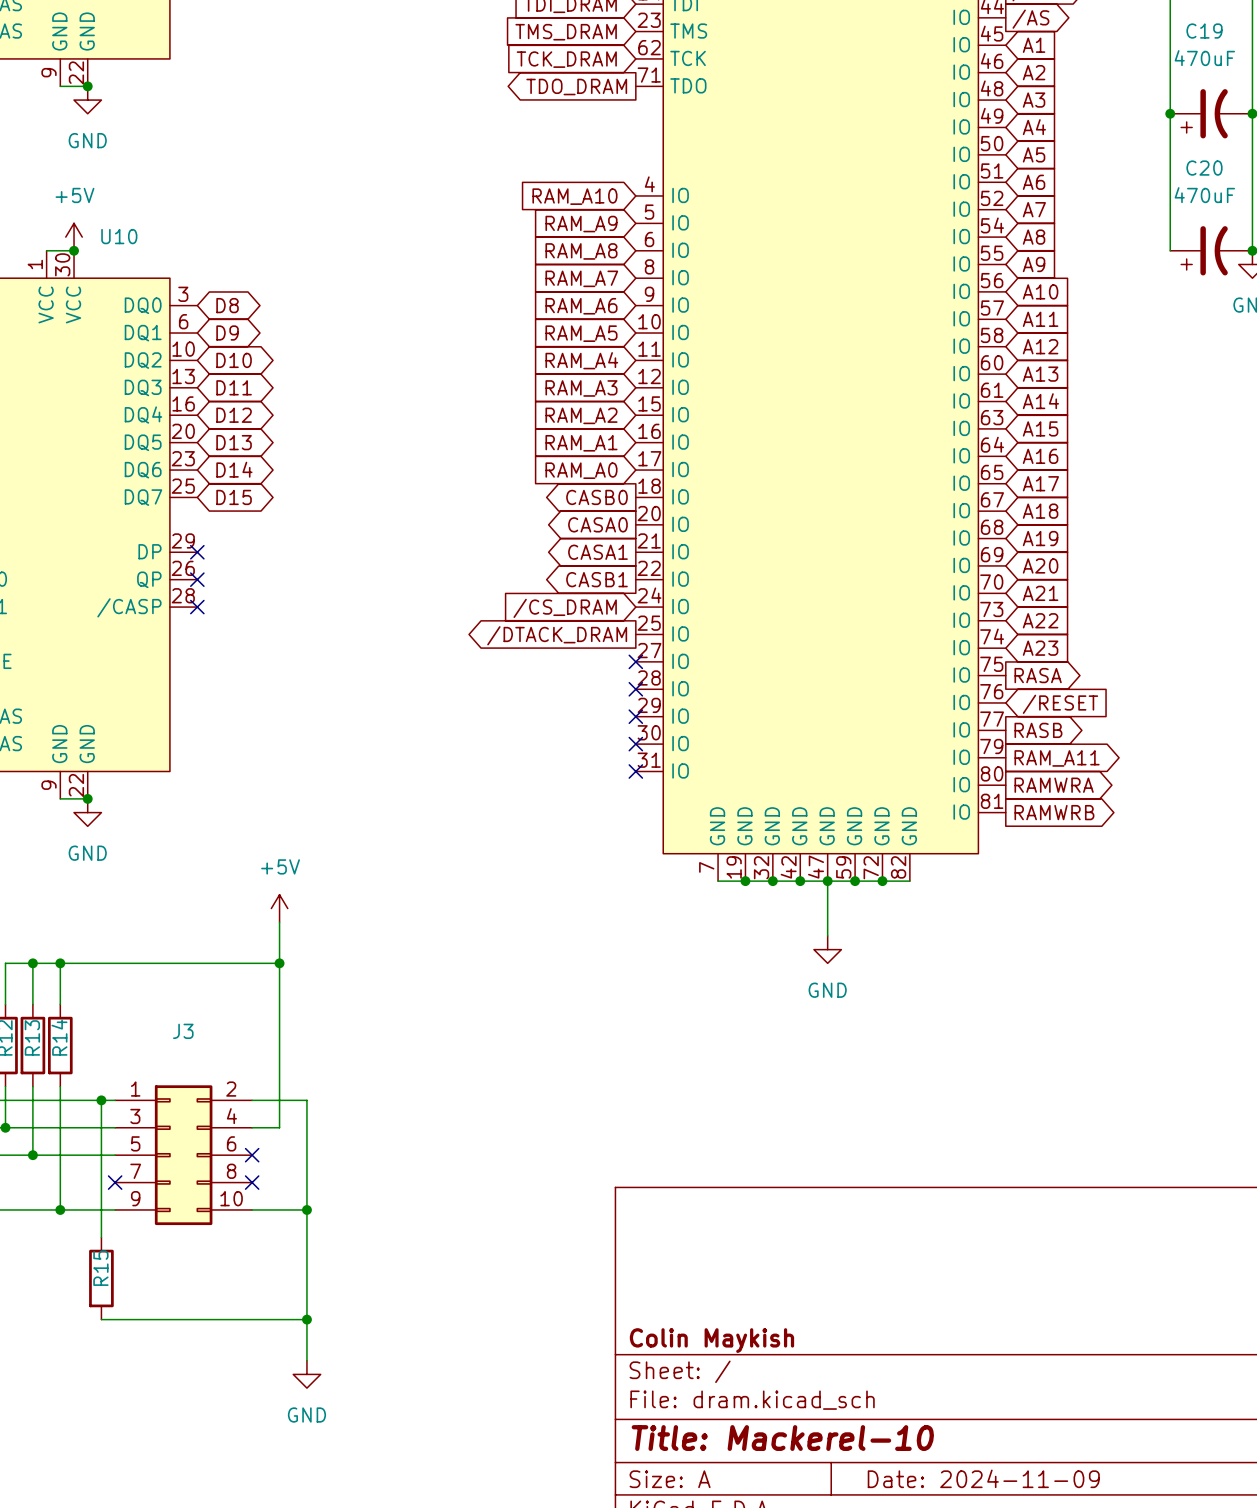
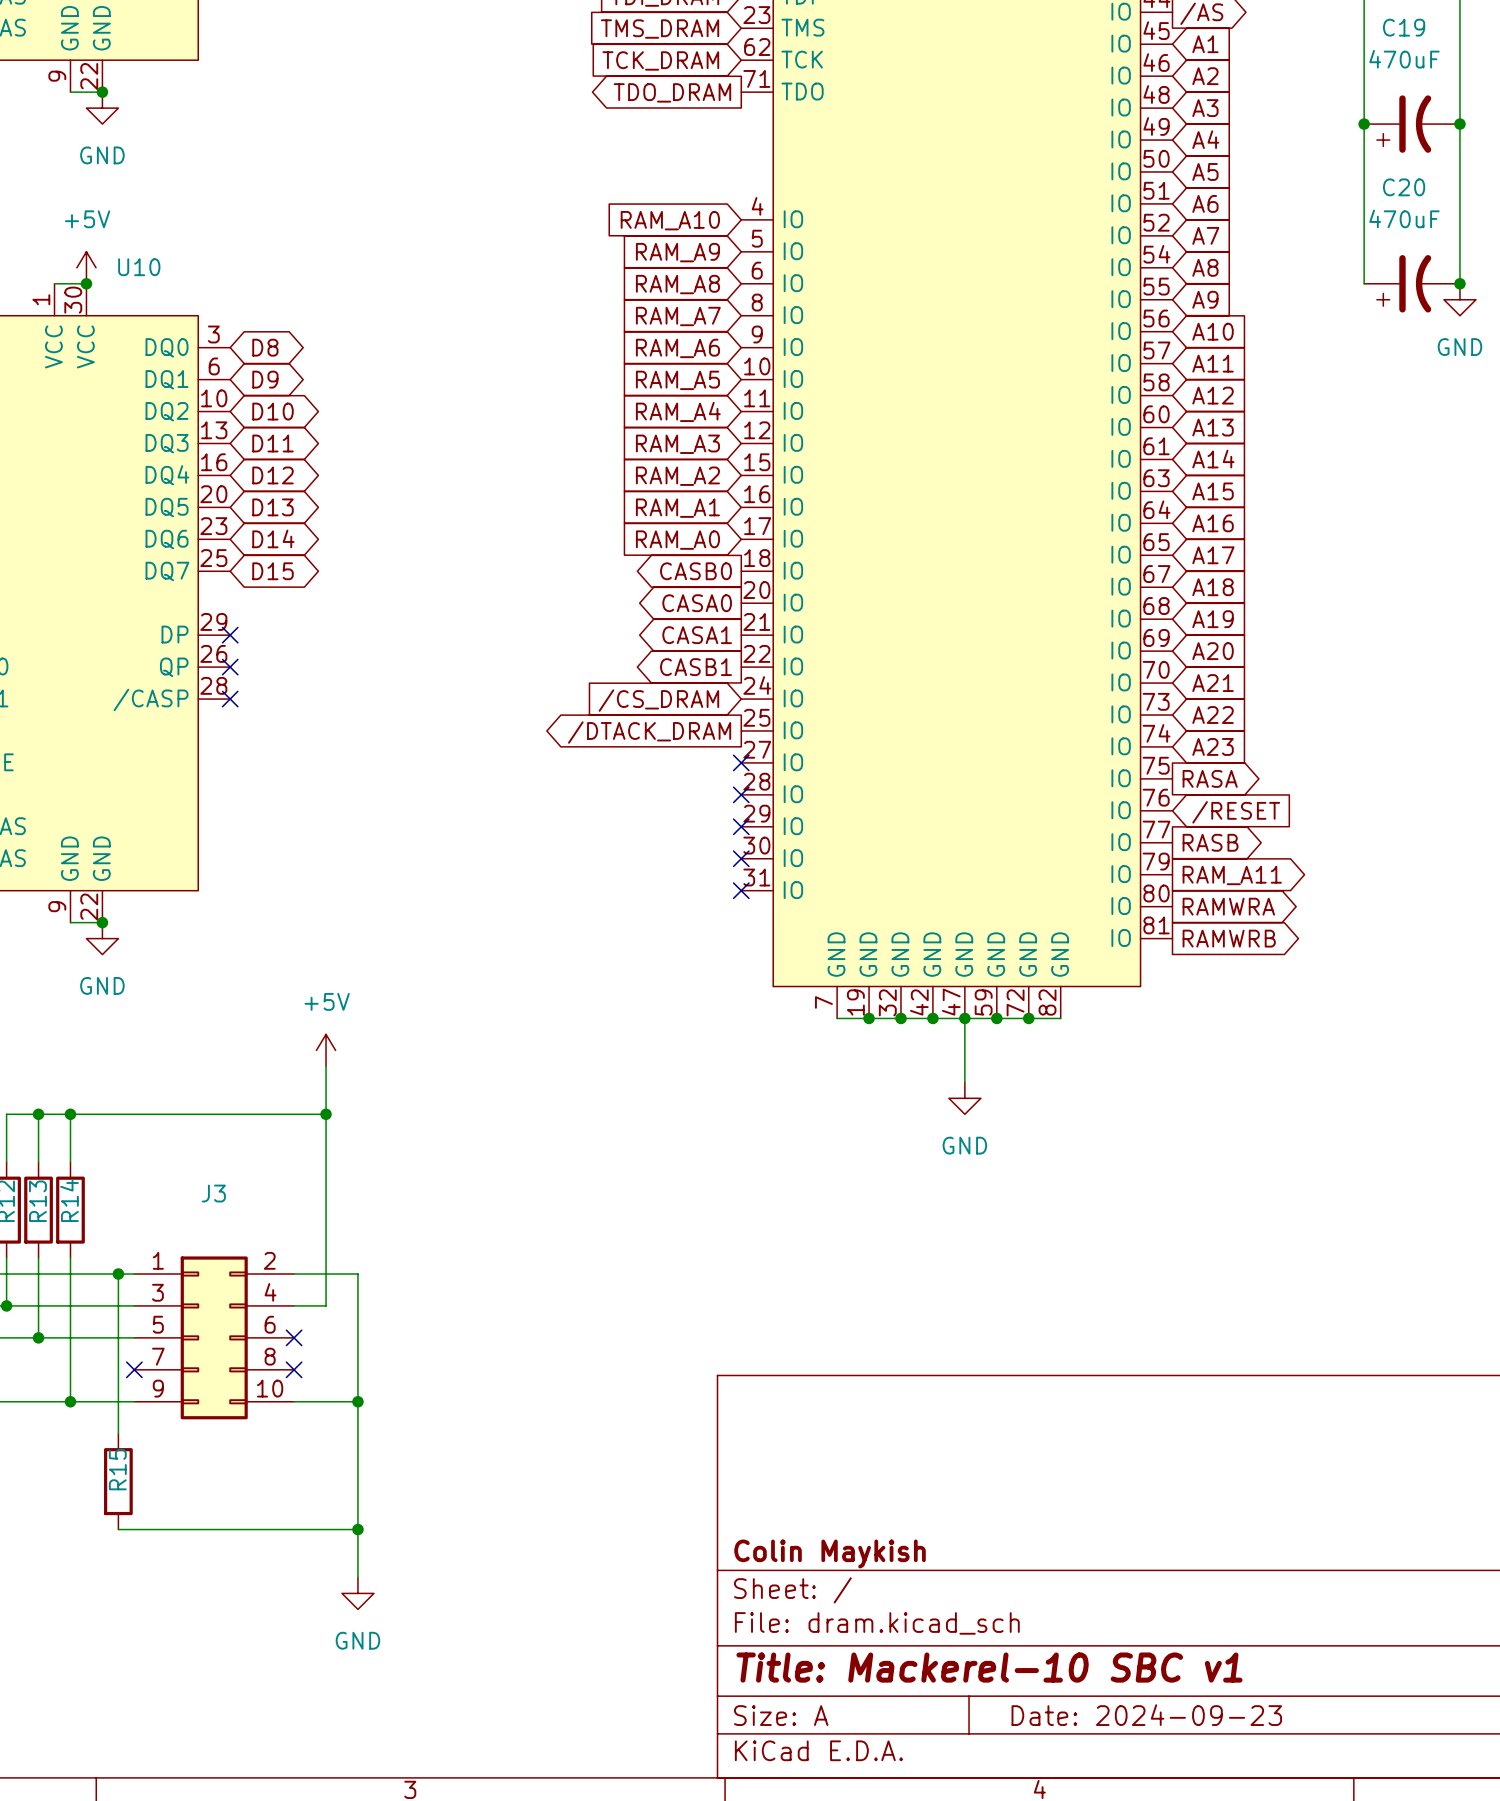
title block: Title: Mackerel-10 (782, 1438) -> Title: Mackerel-10 SBC v1 (989, 1667)
title block: Date: 2024-11-09 (983, 1478) -> Date: 2024-09-23 (1146, 1715)

